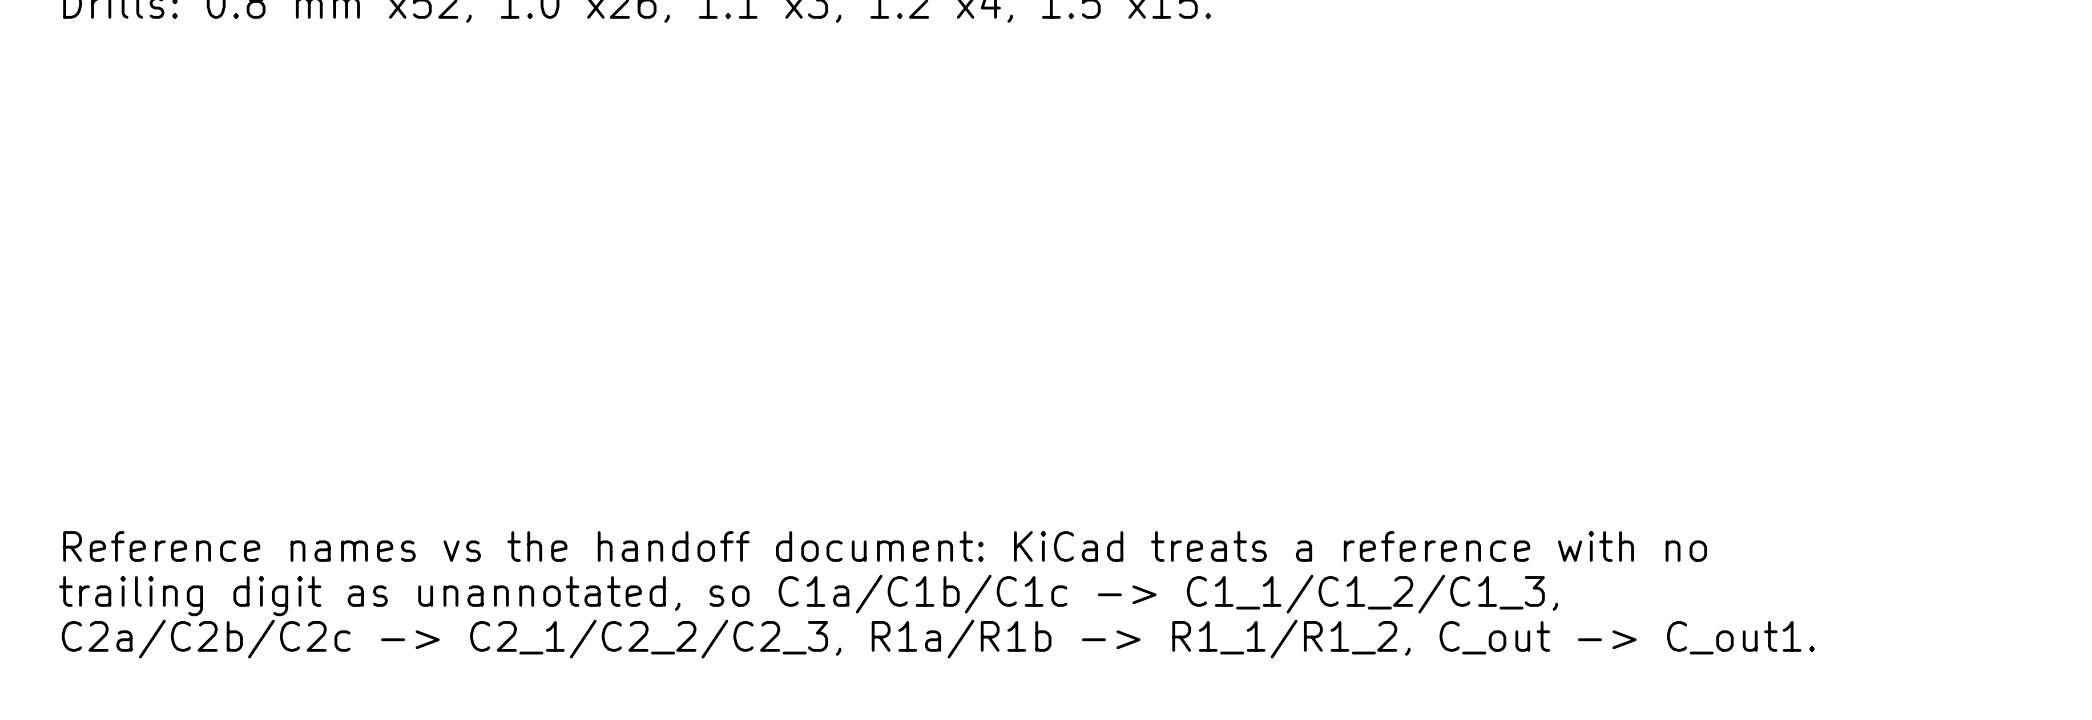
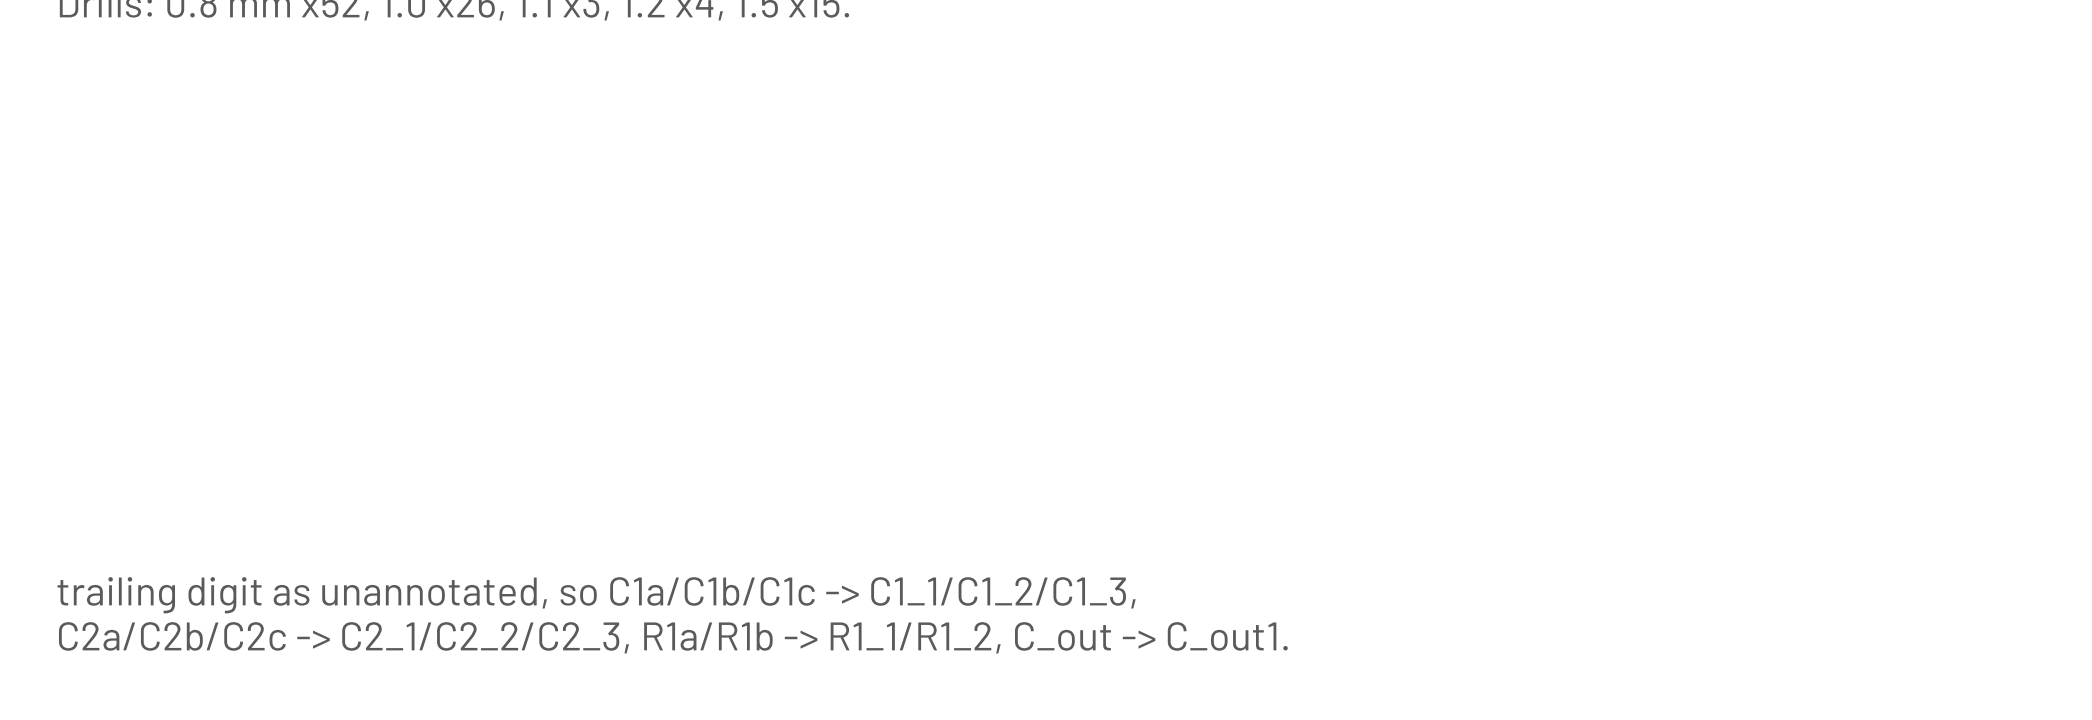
text: Reference names vs the handoff document: KiCad treats a reference with no (885, 546) -> none

